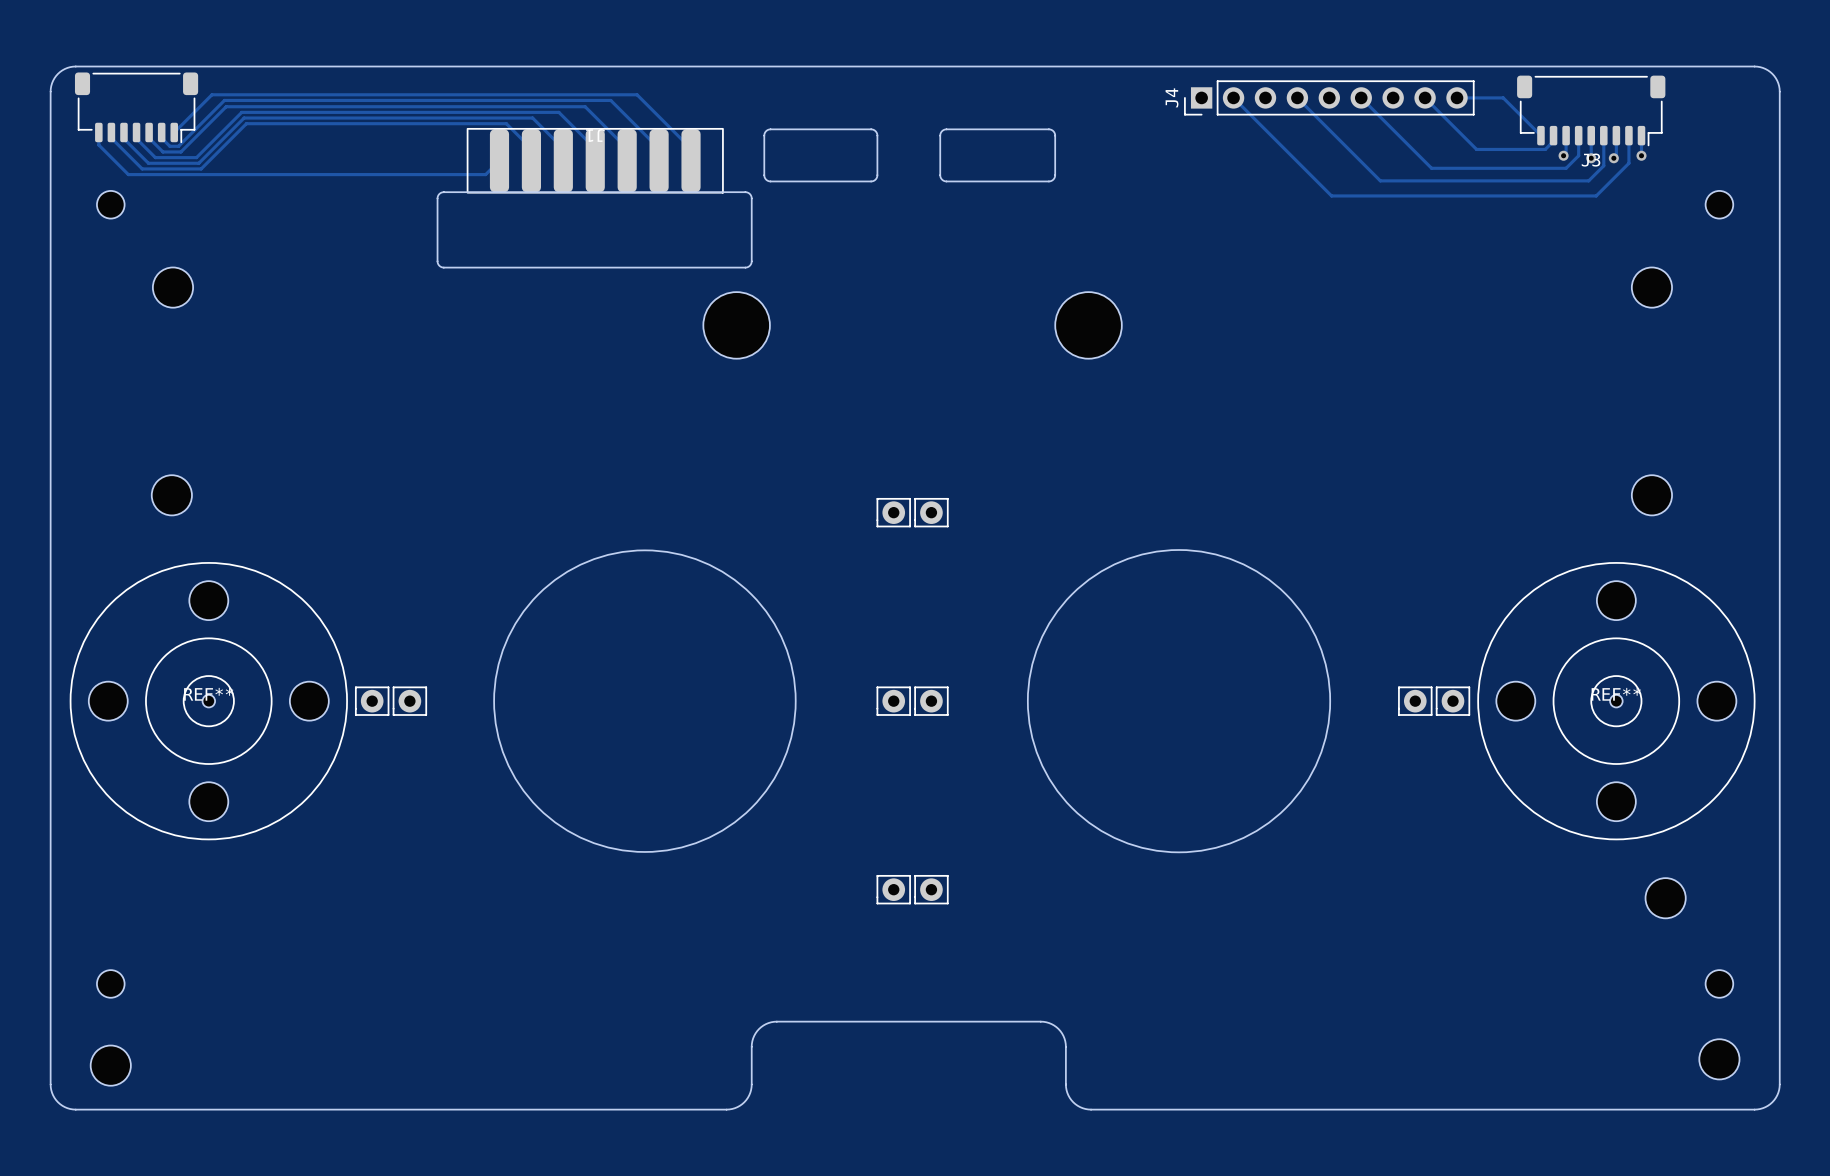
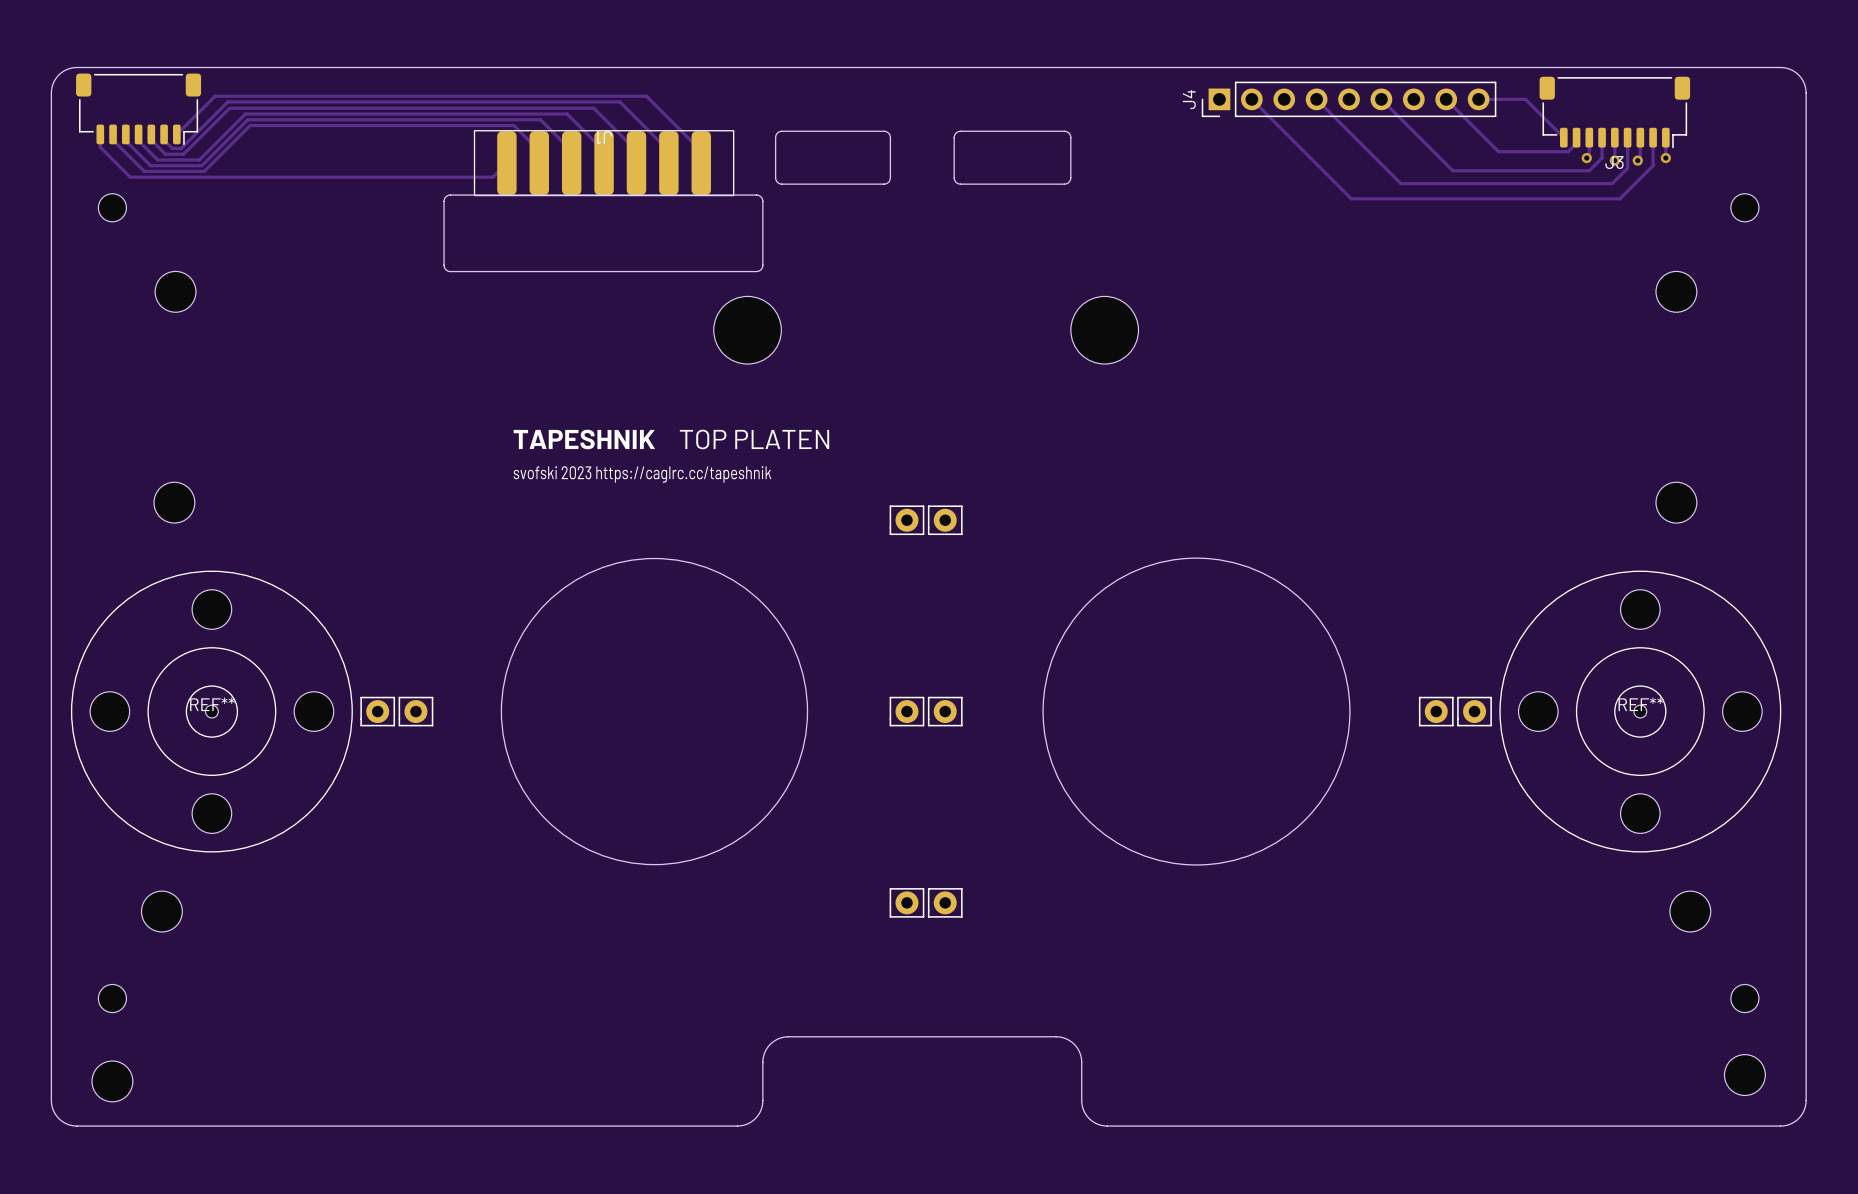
text: none -> TAPESHNIK (584, 439)
text: none -> TOP PLATEN (754, 439)
text: none -> svofski 2023 https://caglrc.cc/tapeshnik (642, 474)
part: none -> (161, 911)

